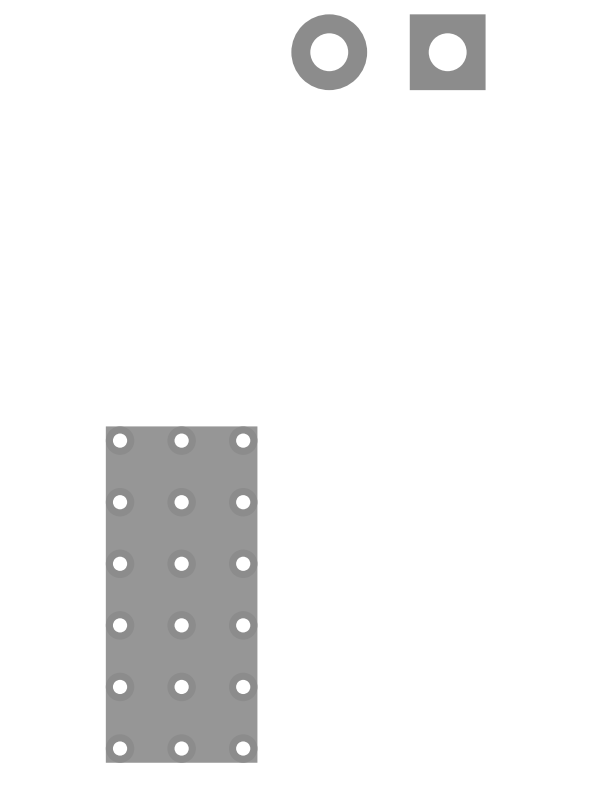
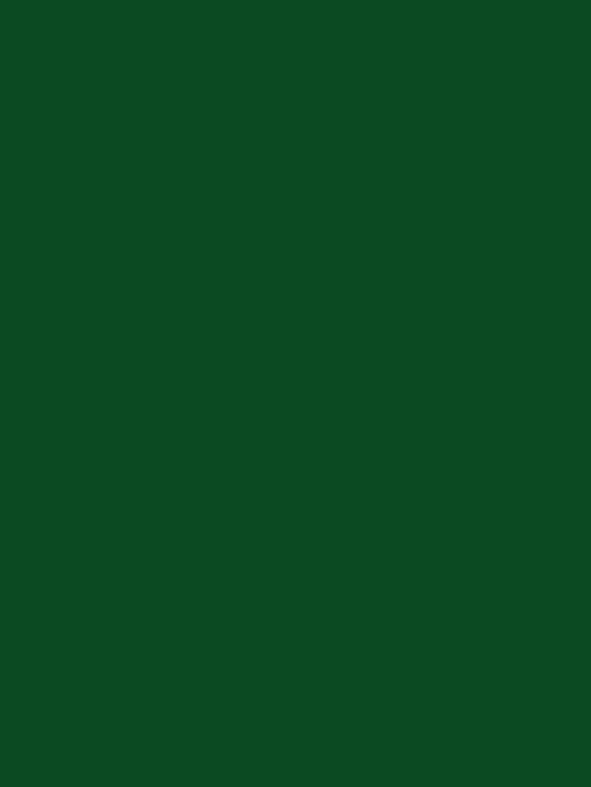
part: (388, 52) -> none
part: (181, 594) -> none

